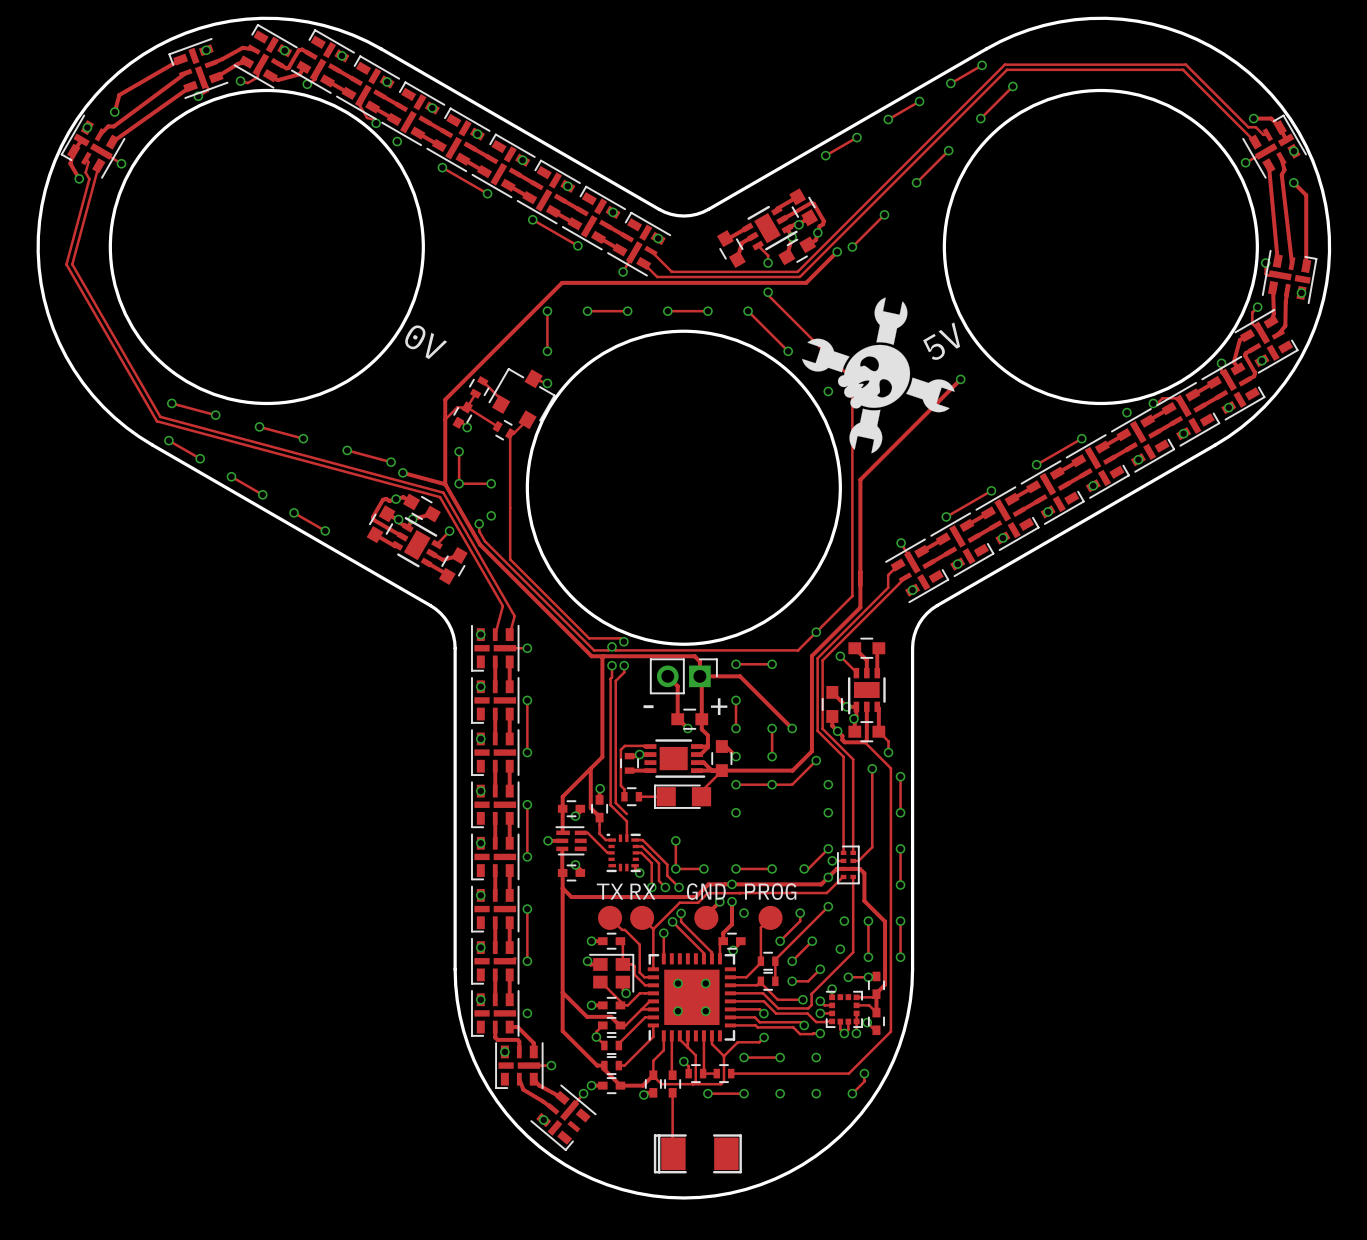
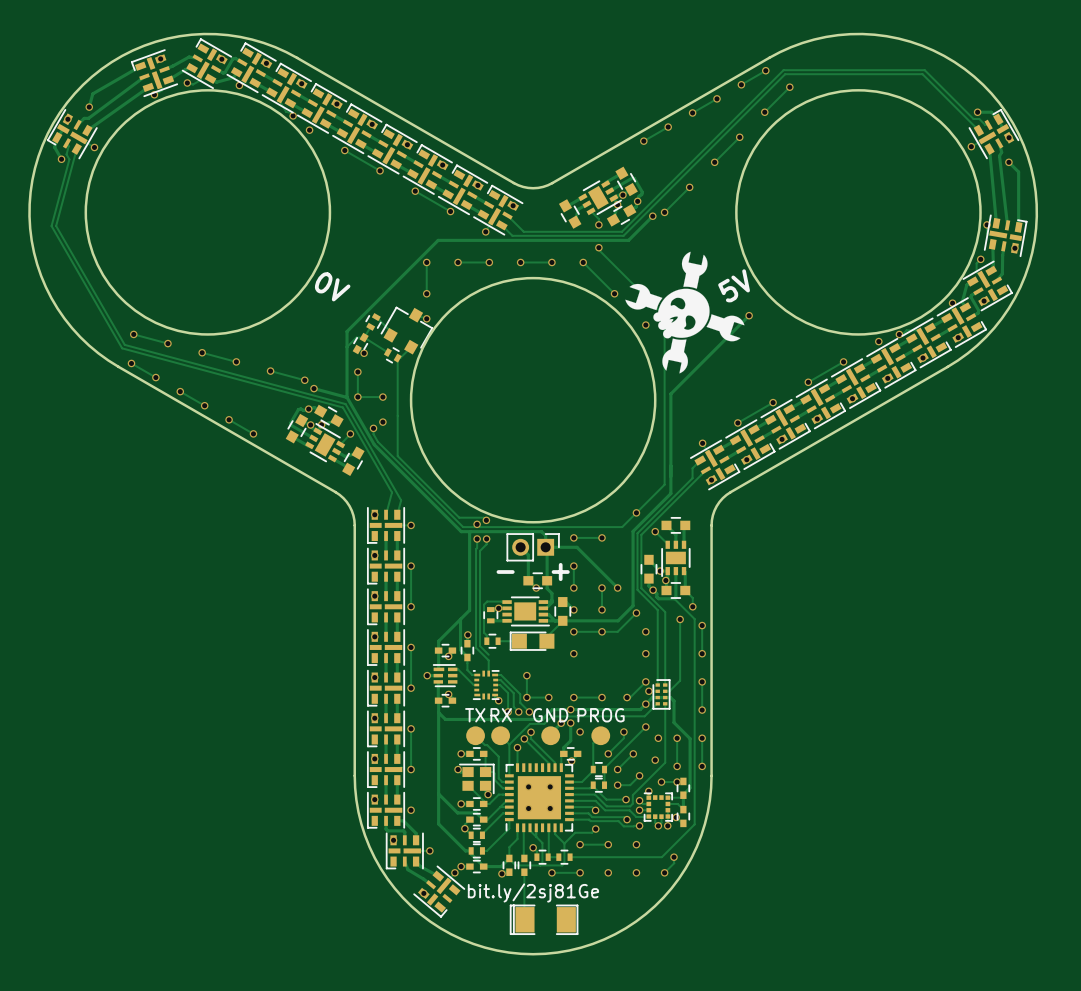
text: none -> bit.ly/2sj81Ge (533, 892)

